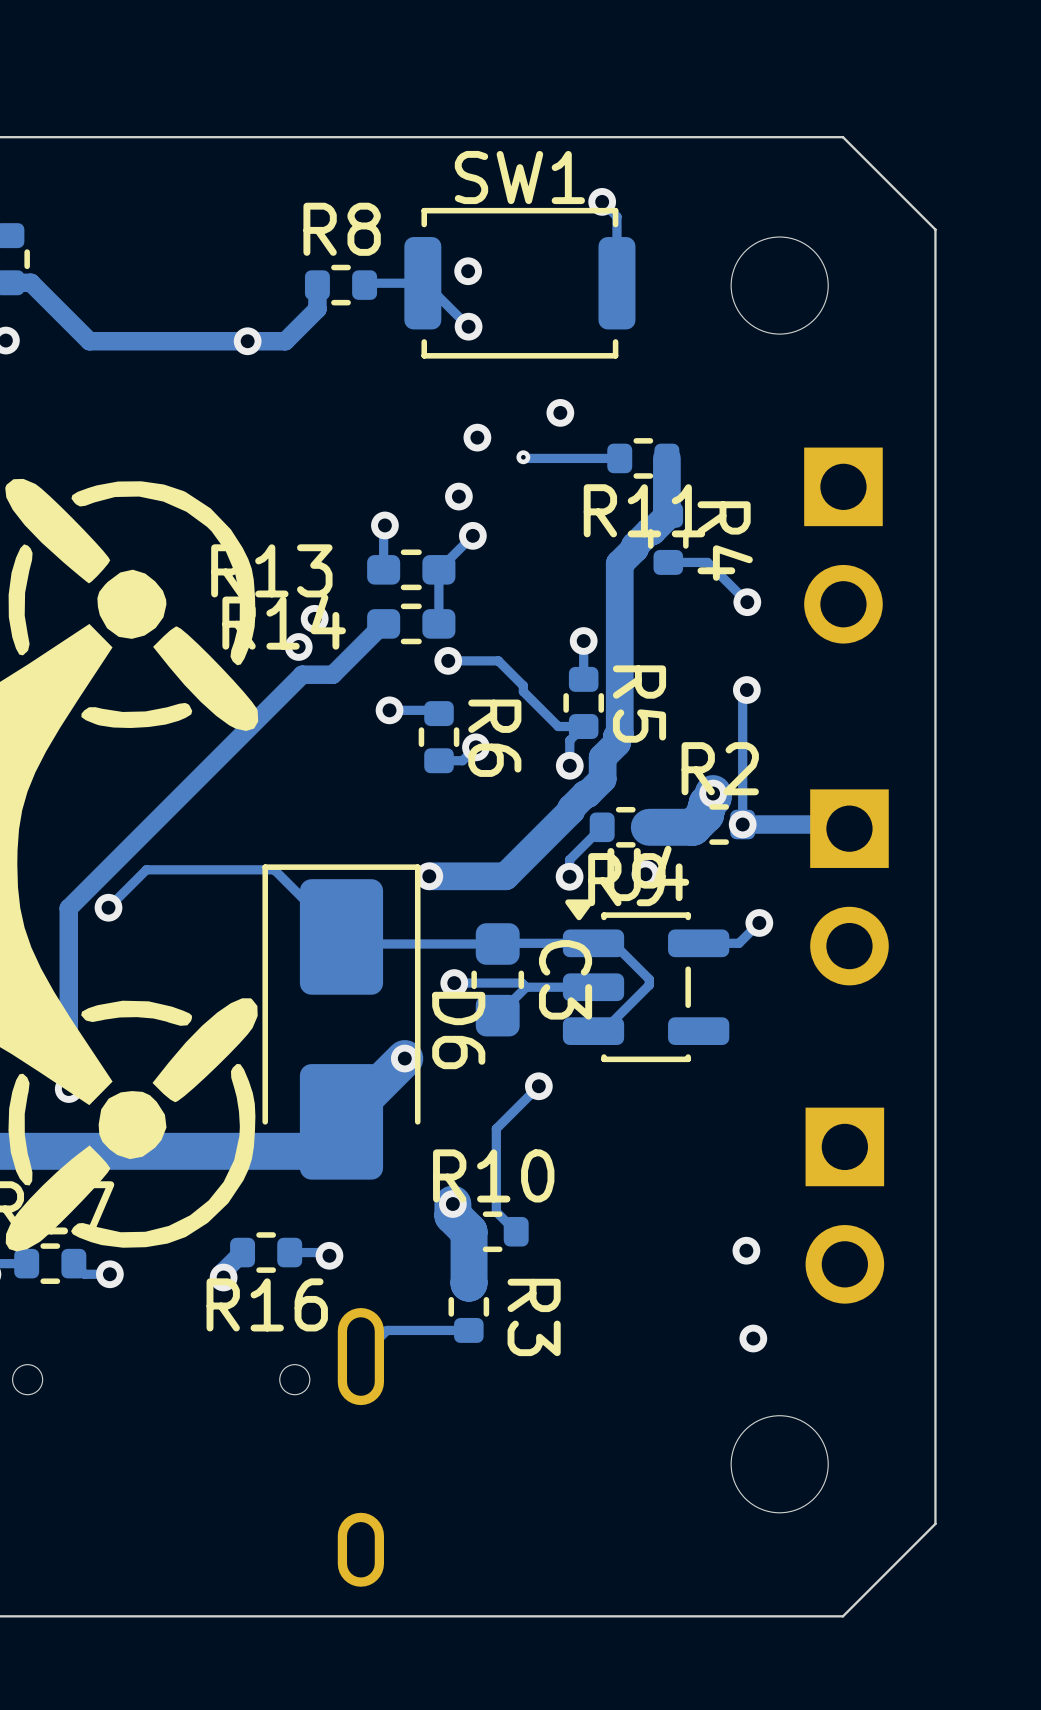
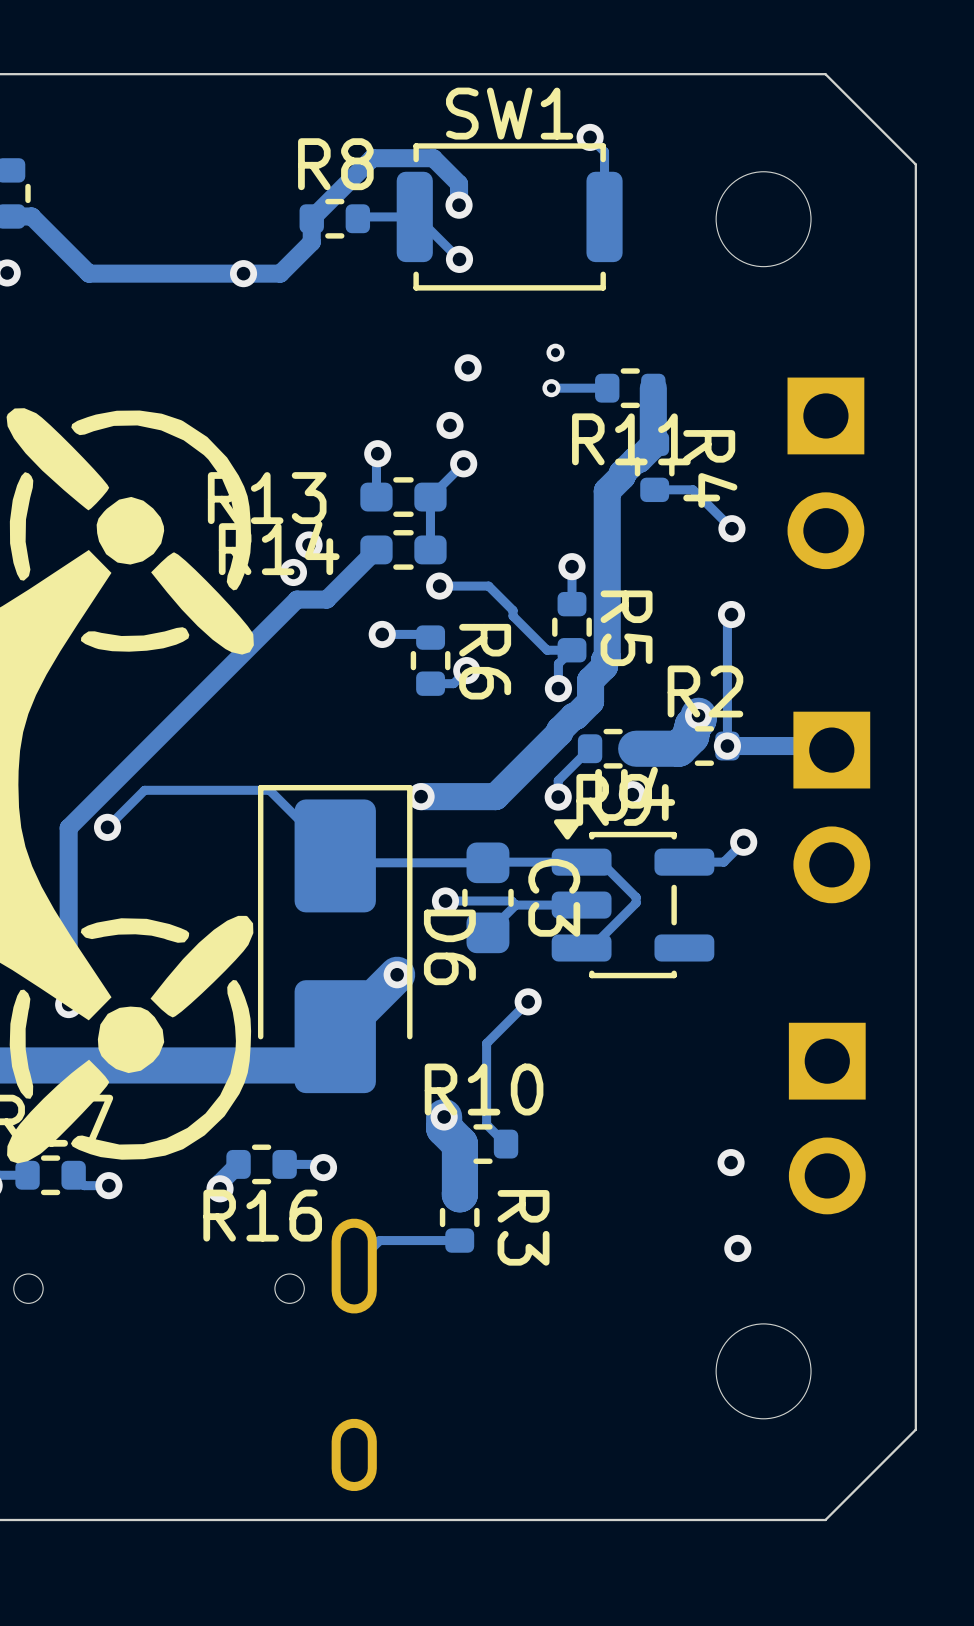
track: none -> (459, 205) (459, 183) (433, 158) (372, 158) (311, 218)
via size: [546, 399, 575, 427] -> [546, 343, 565, 362]
track: (523, 457) (562, 458) -> none
via: (523, 457) -> none
via: none -> (551, 388)

